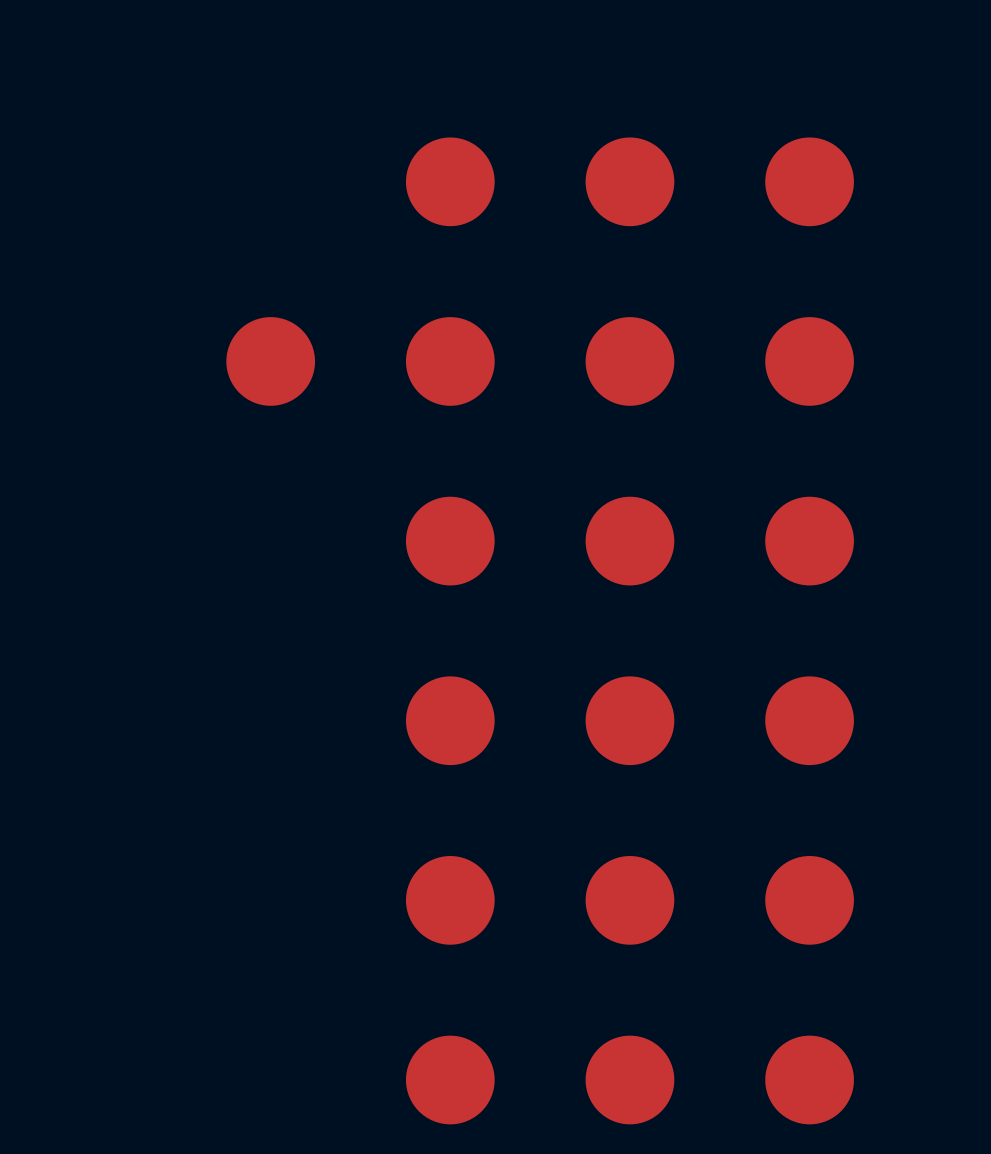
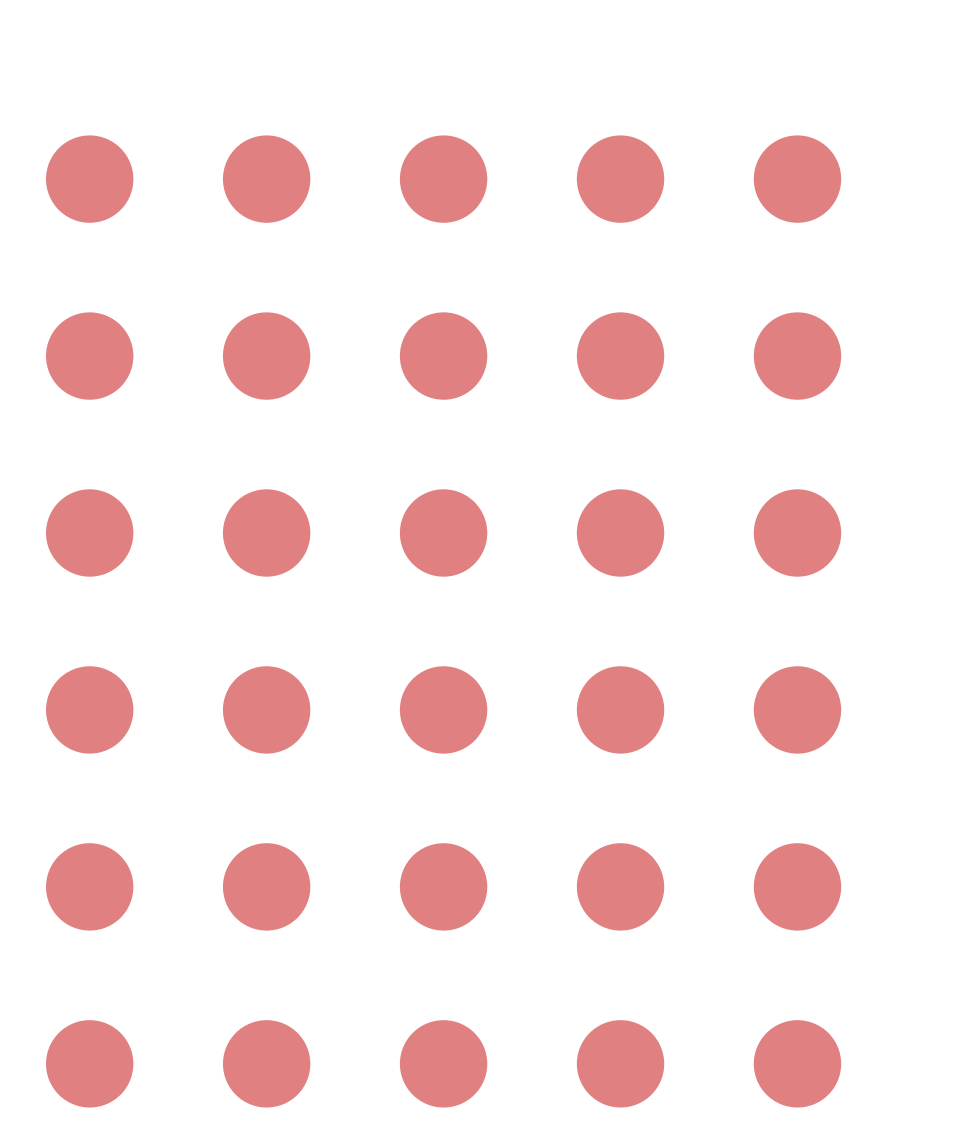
part: none -> (89, 179)
part: none -> (266, 179)
part: none -> (89, 356)
part: none -> (89, 532)
part: none -> (266, 532)
part: none -> (89, 709)
part: none -> (266, 709)
part: none -> (89, 886)
part: none -> (266, 886)
part: none -> (89, 1063)
part: none -> (266, 1063)

